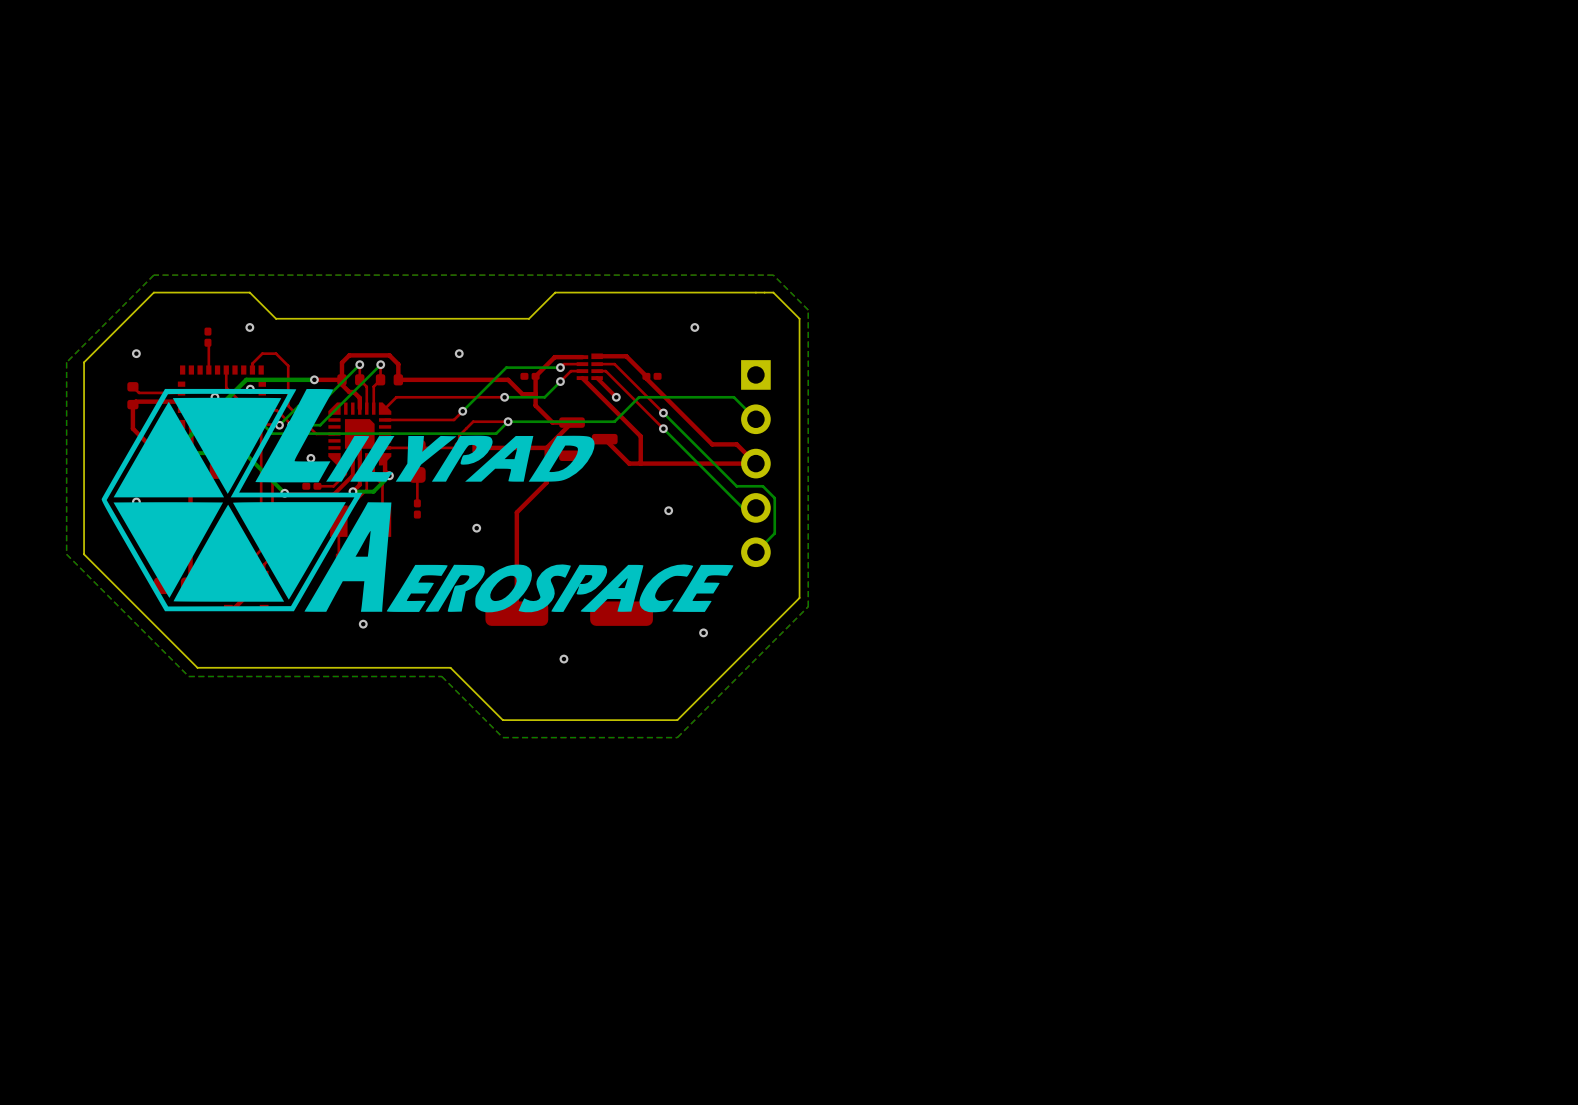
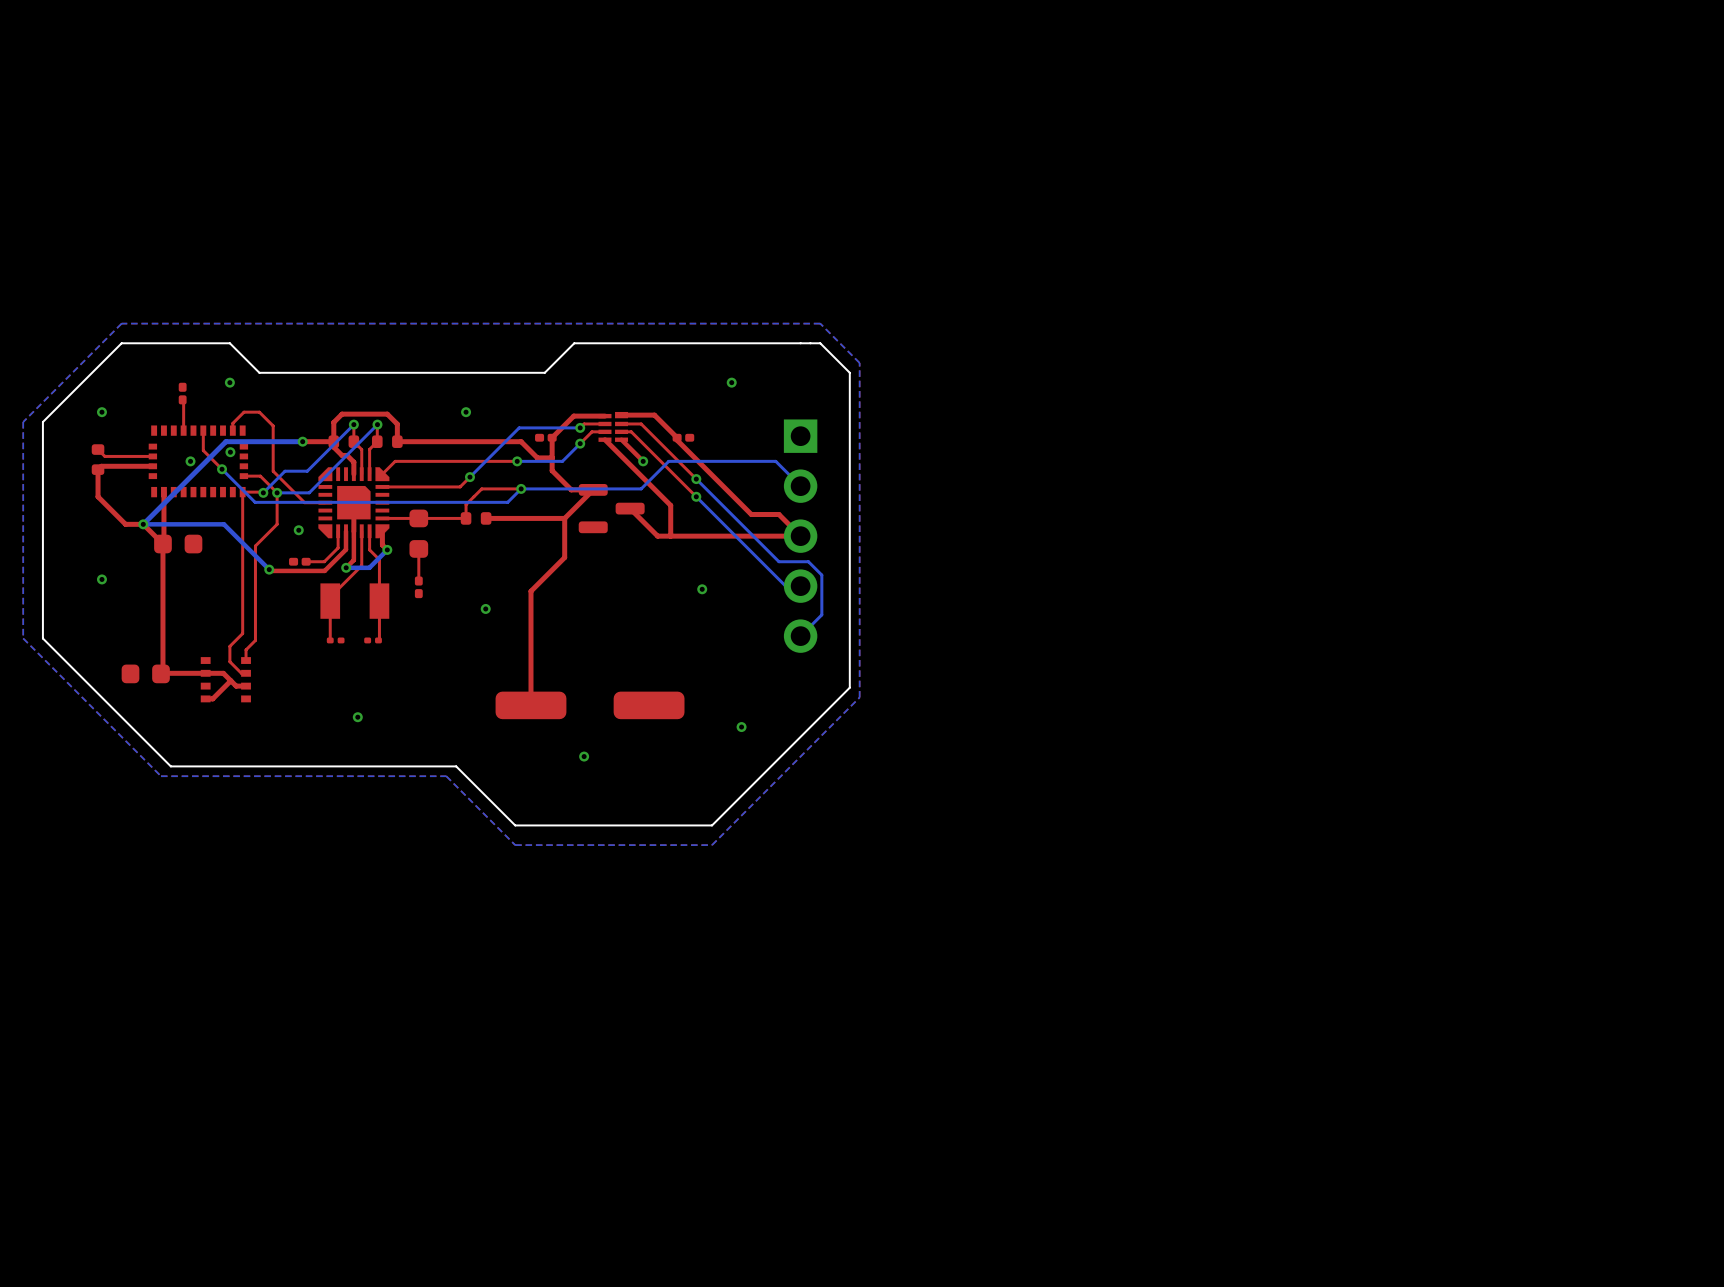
drawing: [101, 388, 734, 613] -> none

